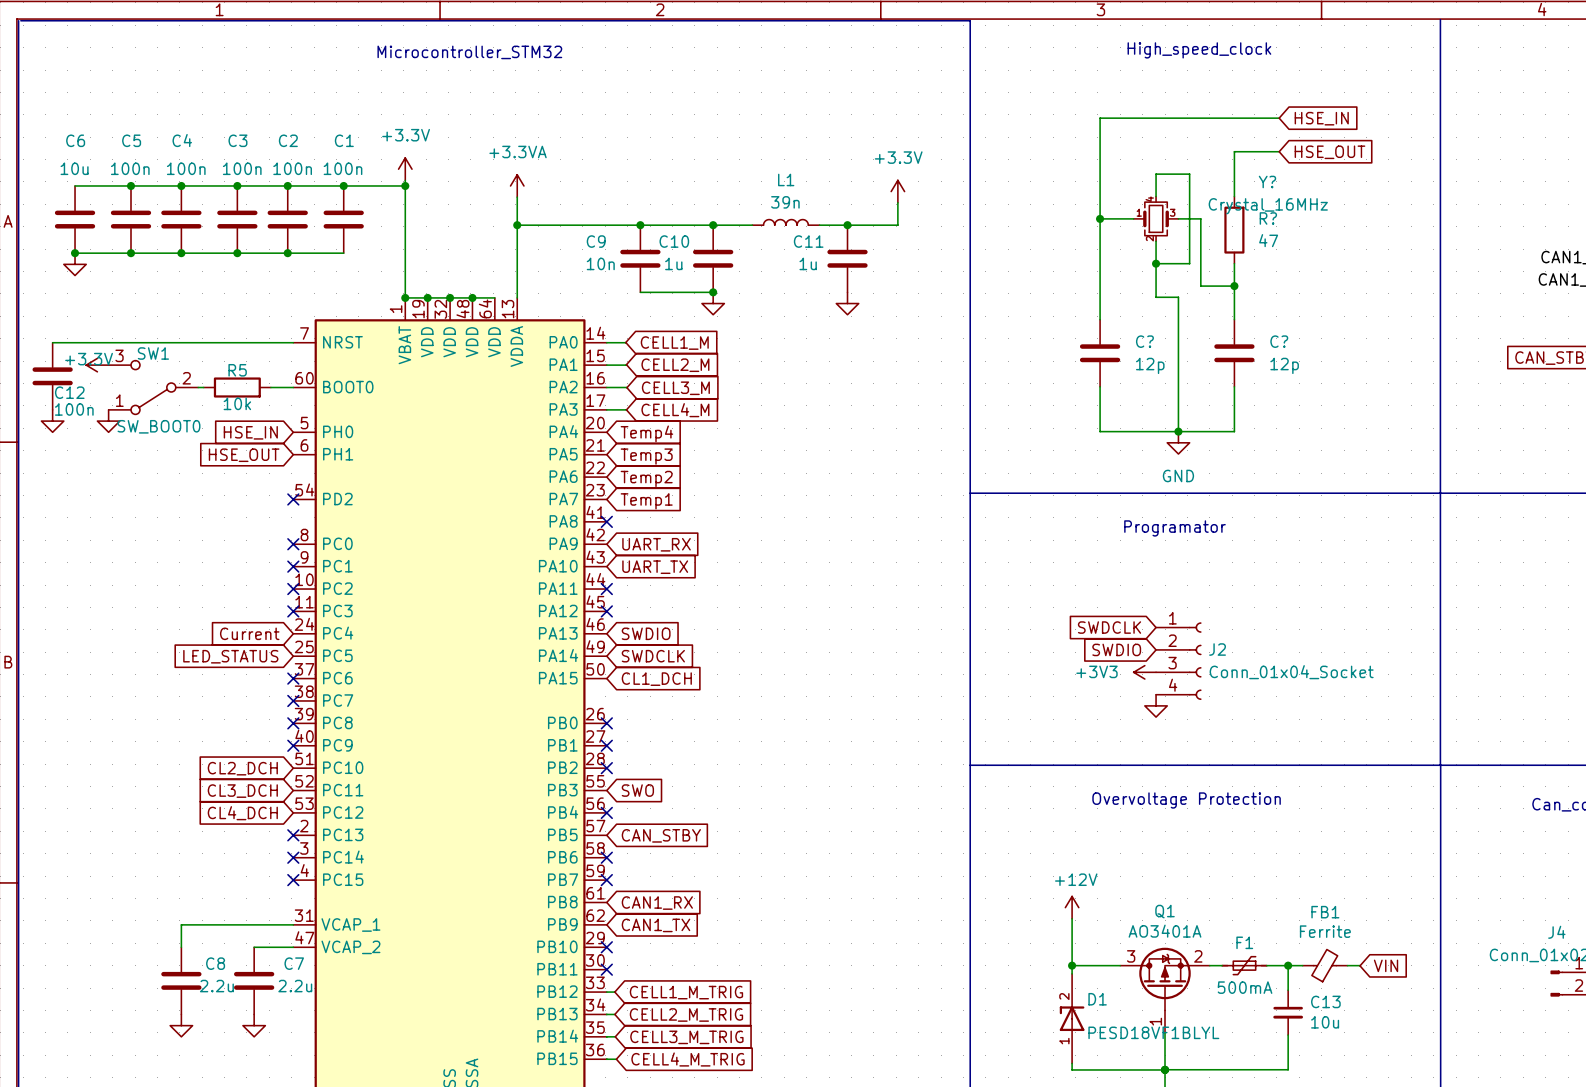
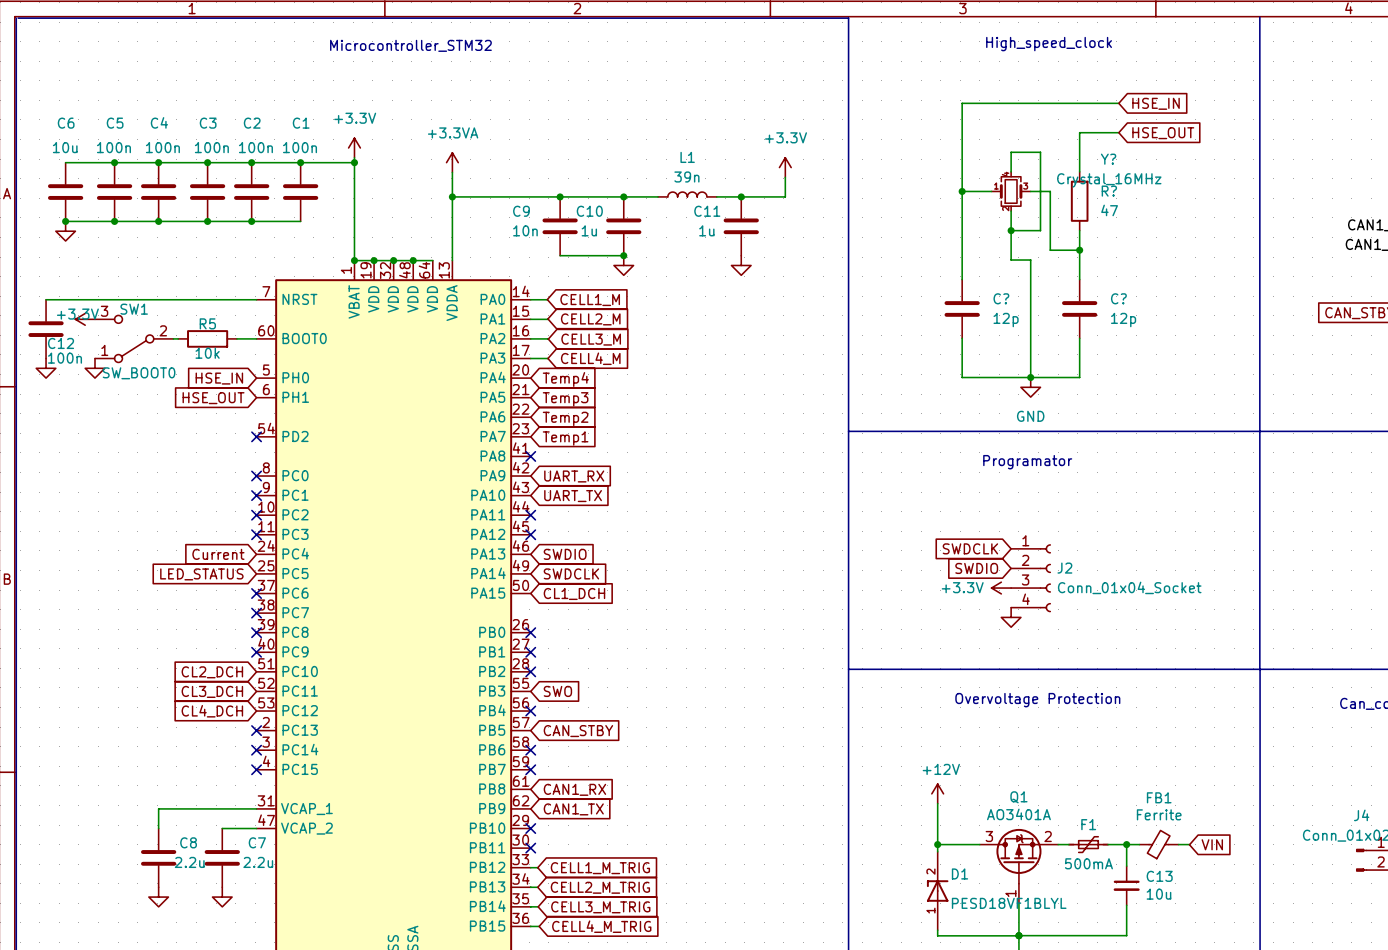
power symbol: +3V3 (1144, 672) -> +3.3V (1001, 588)

